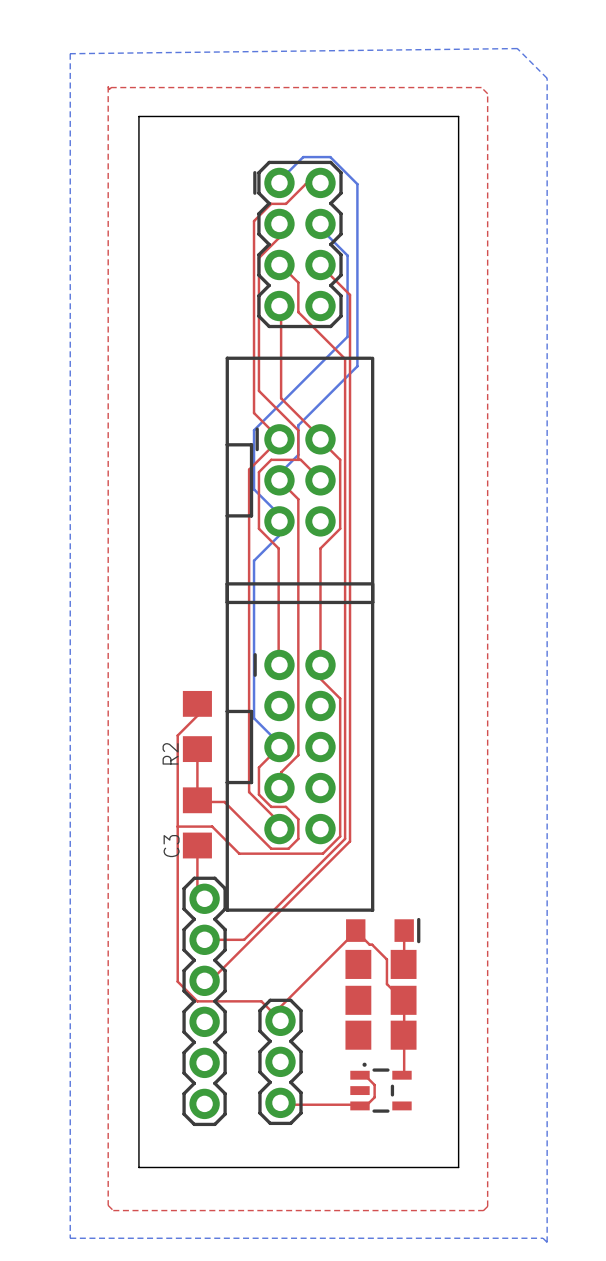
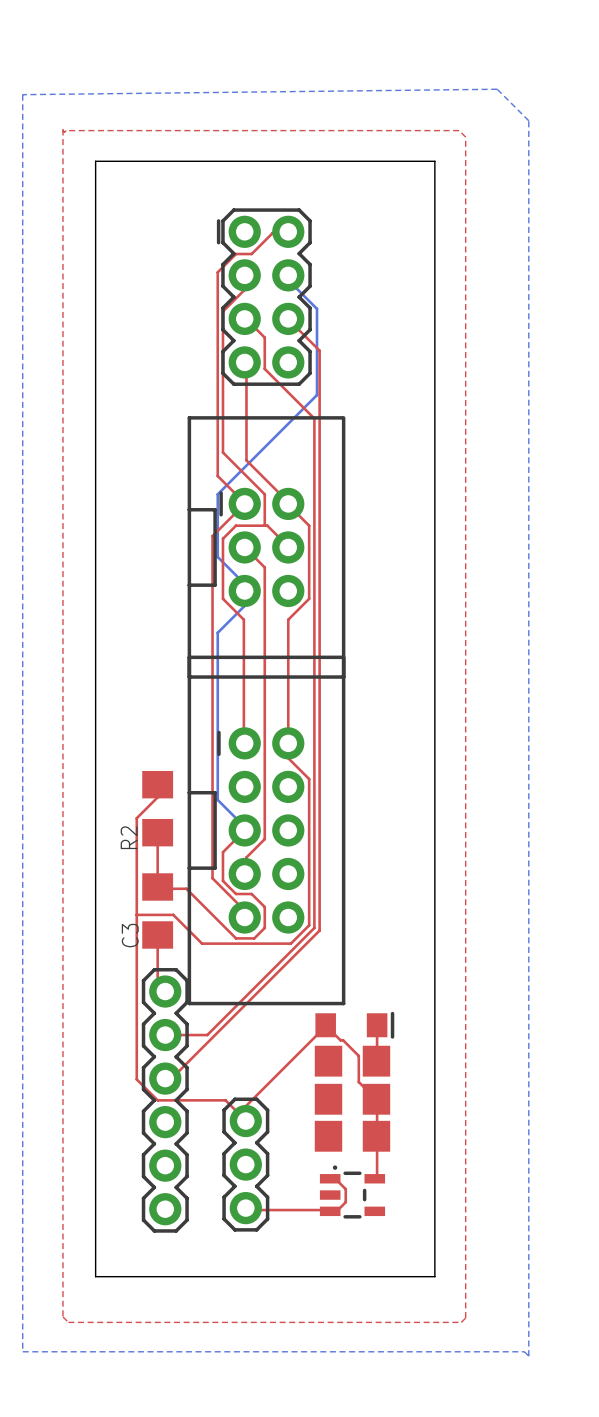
bottom track: (279, 182) (303, 157) (330, 157) (357, 184) (357, 366) (298, 425) (298, 454) (281, 472) (279, 480) -> none

